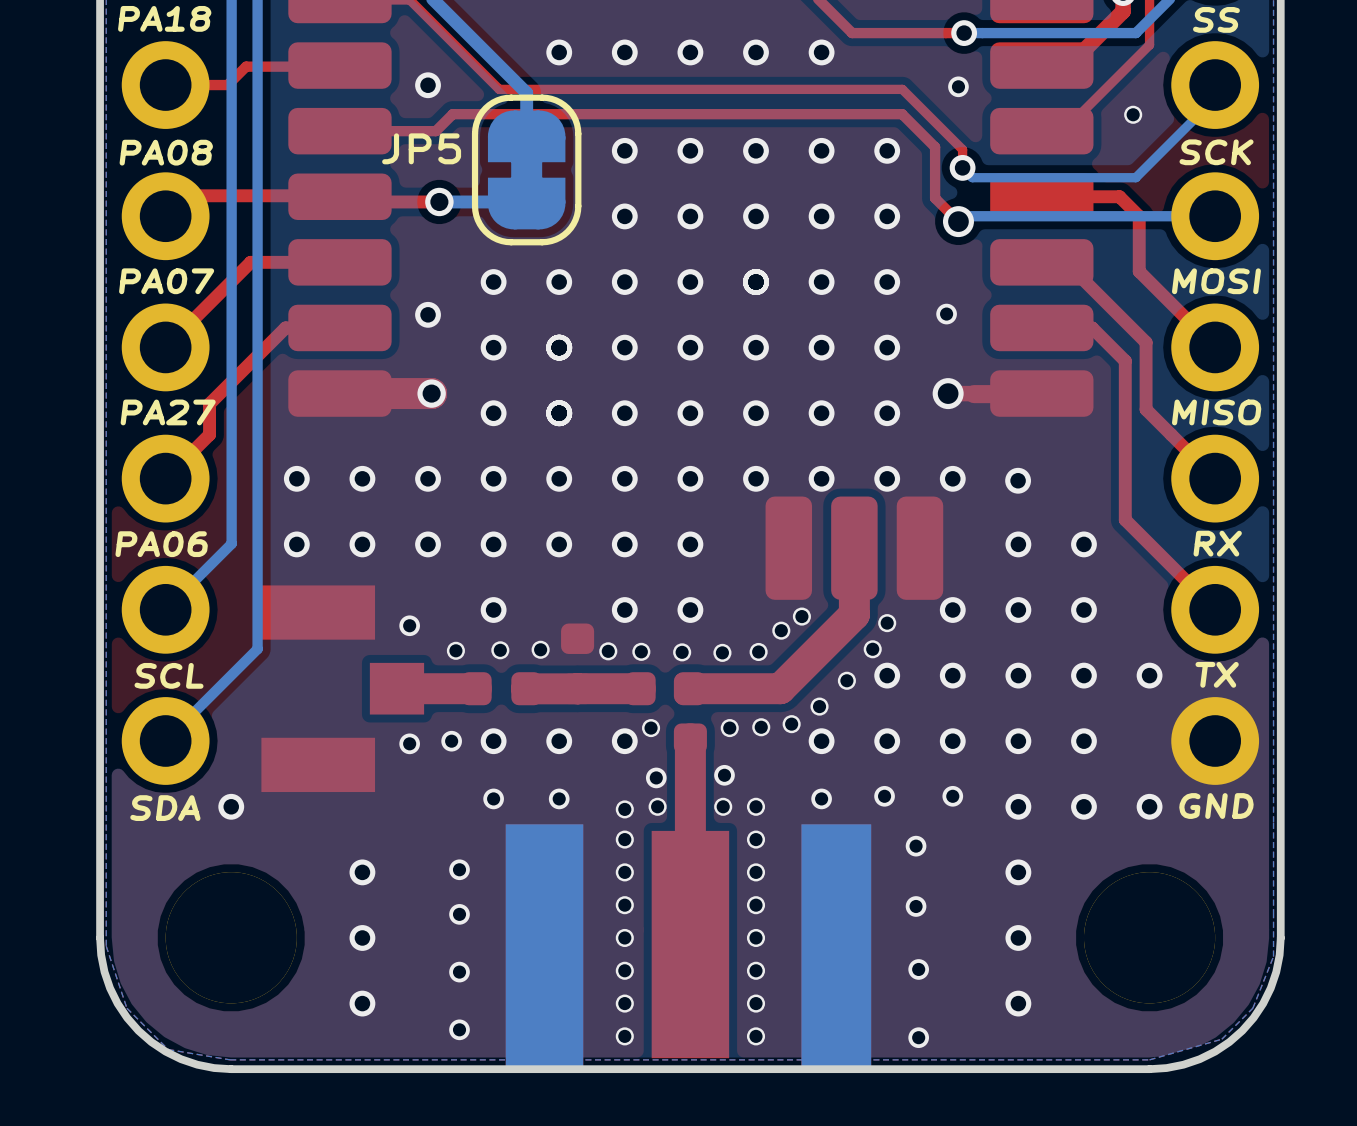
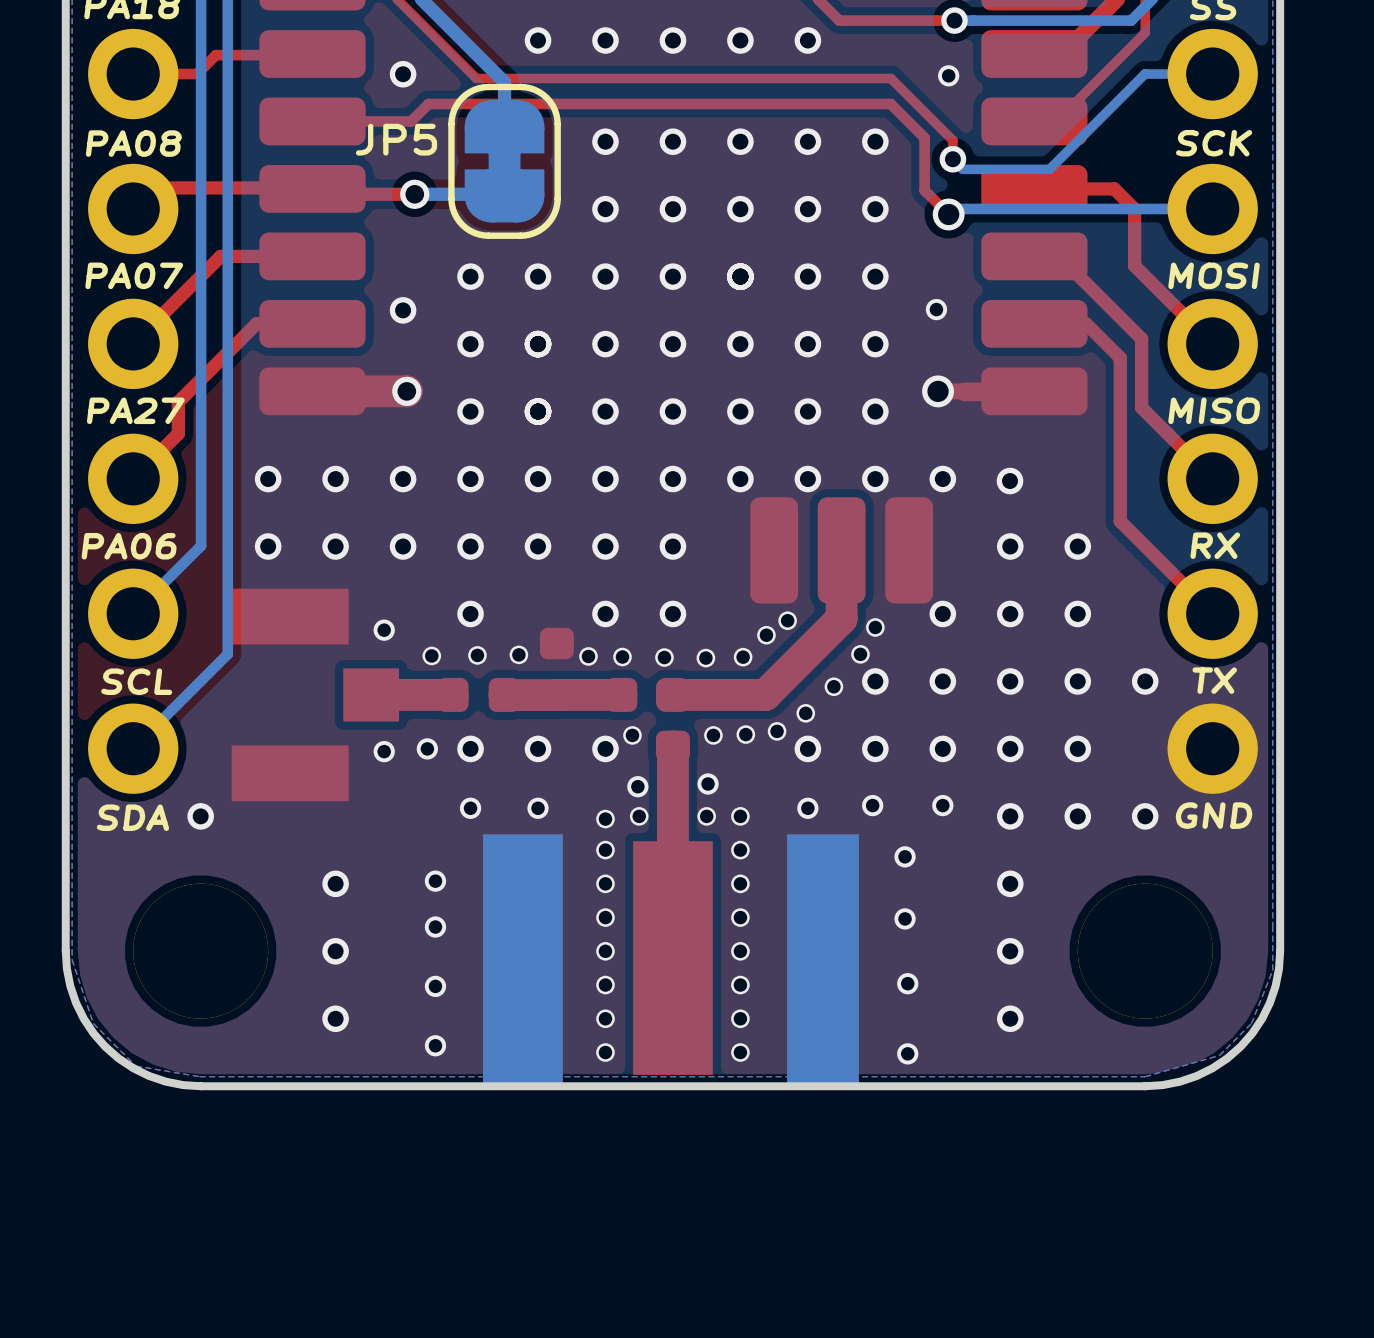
bottom track: (1215, 85) (1215, 98) (1135, 177) (1056, 177) -> (1212, 74) (1144, 74) (1049, 169)
via: (1133, 114) -> none

